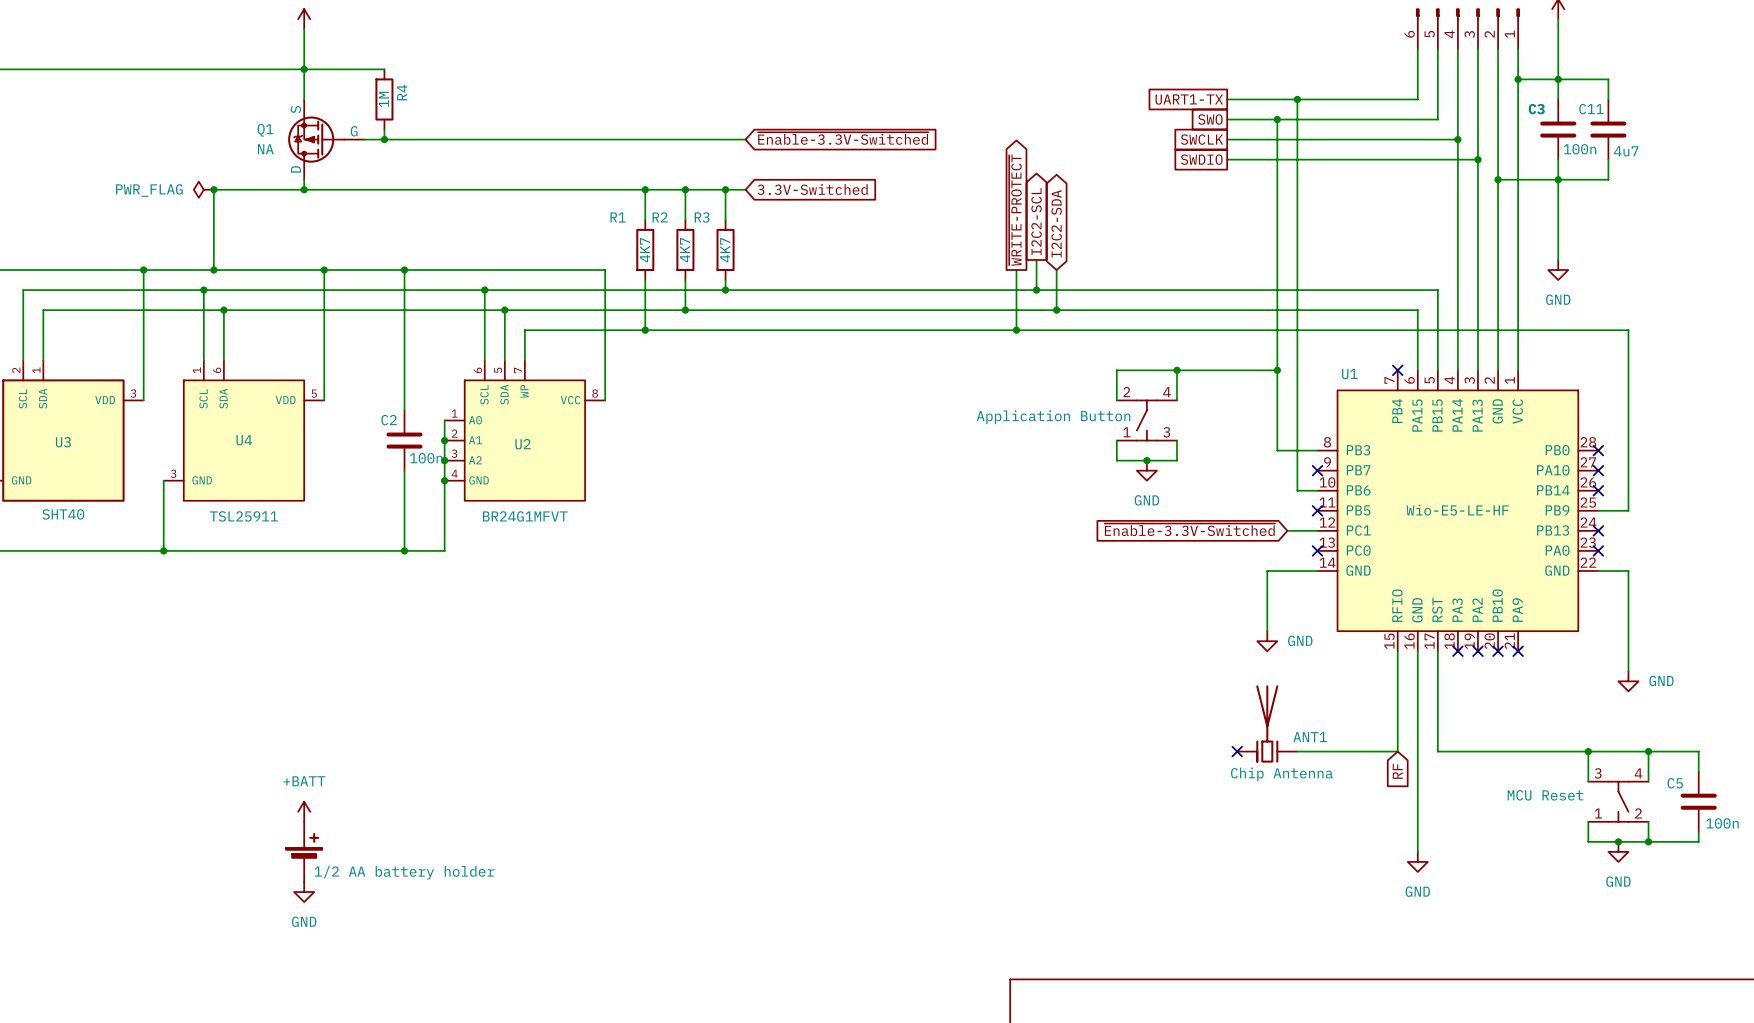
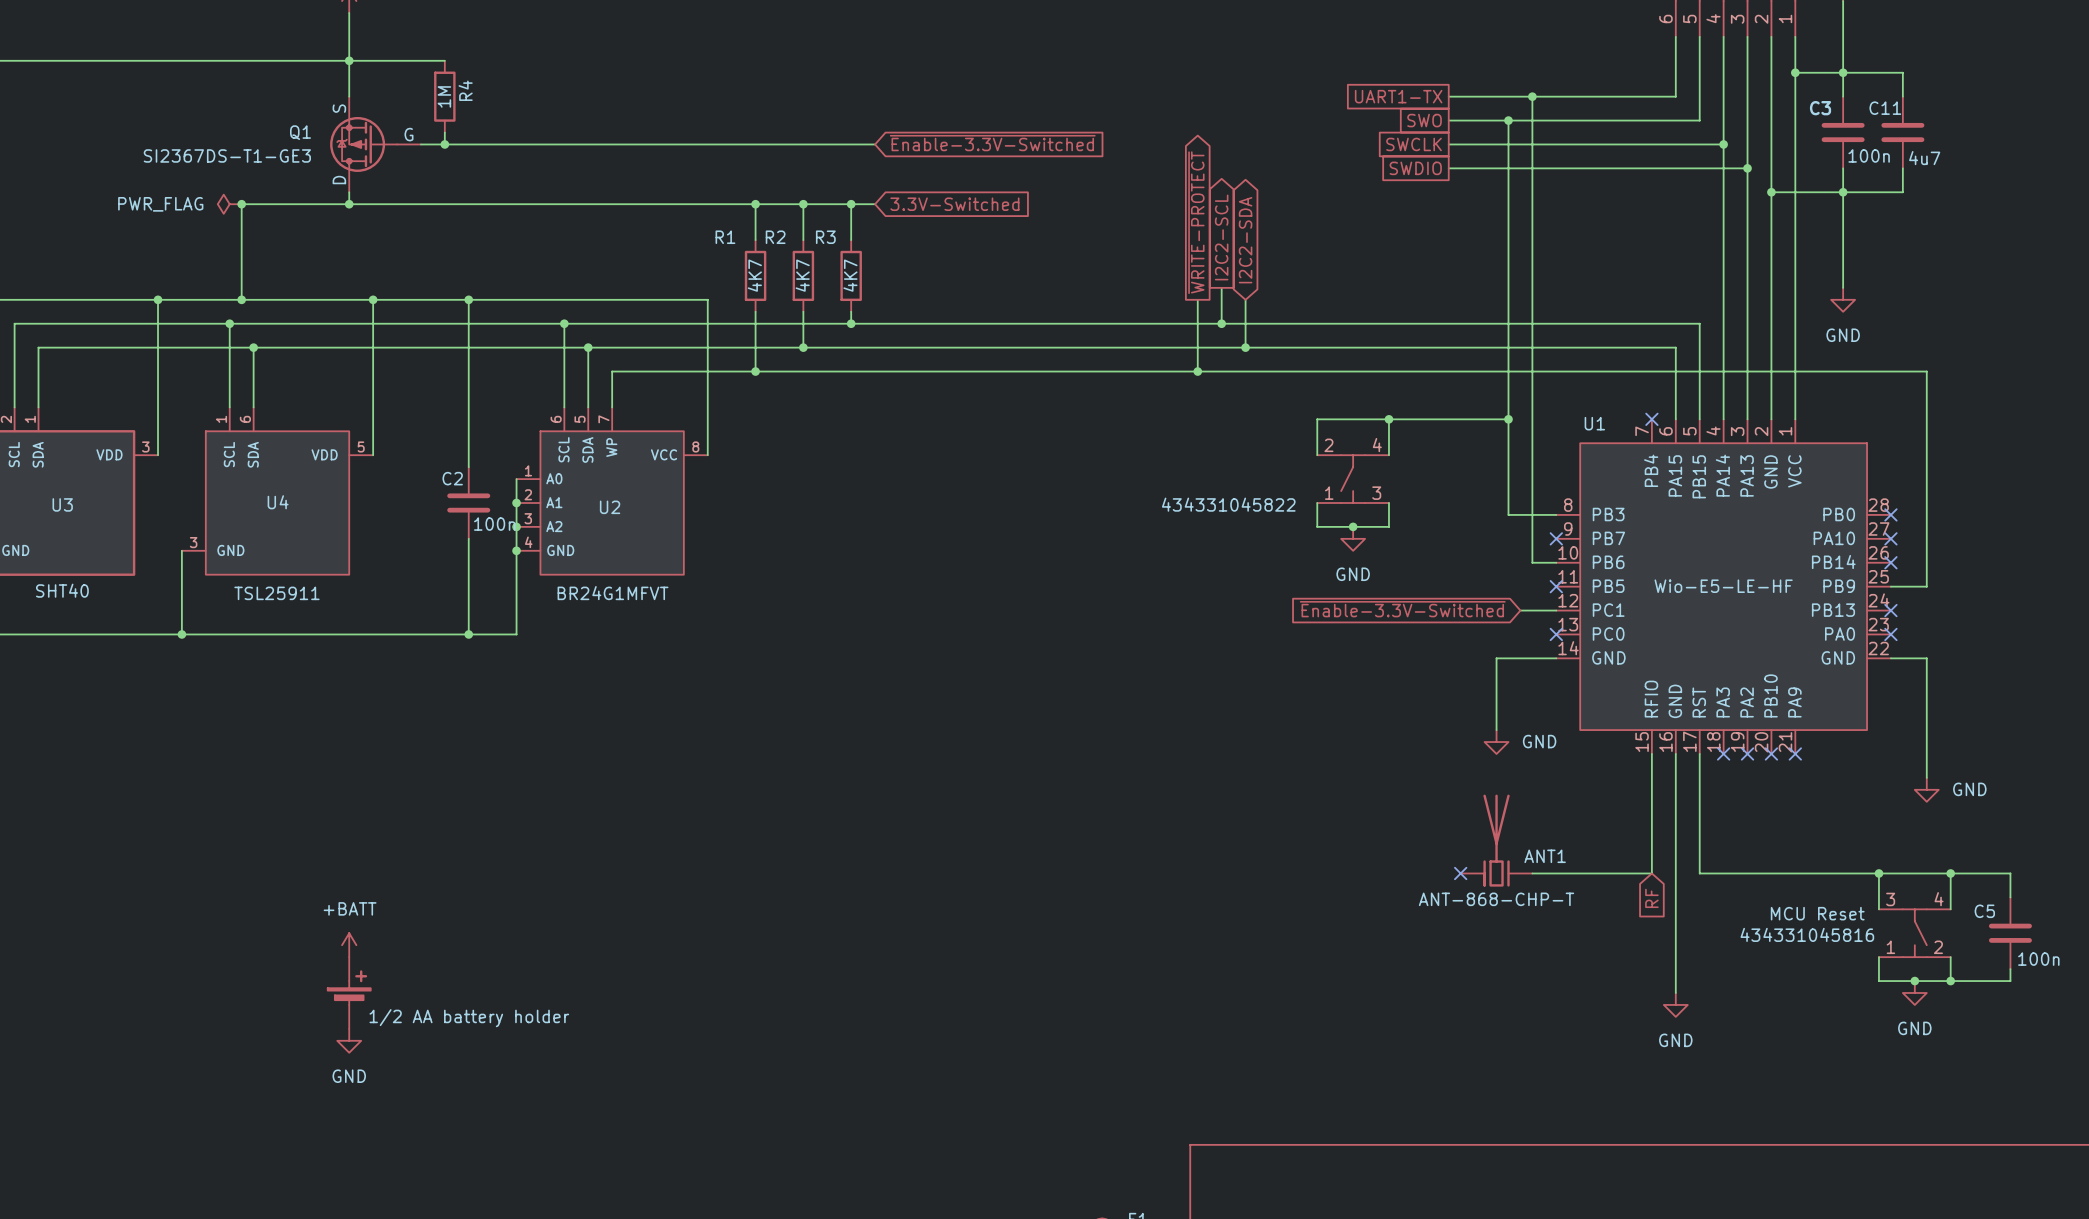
Q1 value: NA (265, 149) -> SI2367DS-T1-GE3 (227, 155)
part value: Application Button (1053, 417) -> 434331045822 (1228, 504)
ANT1 value: Chip Antenna (1281, 774) -> ANT-868-CHP-T (1496, 899)
part text: none -> MCU Reset (1817, 913)
part value: MCU Reset (1545, 795) -> 434331045816 (1807, 934)

